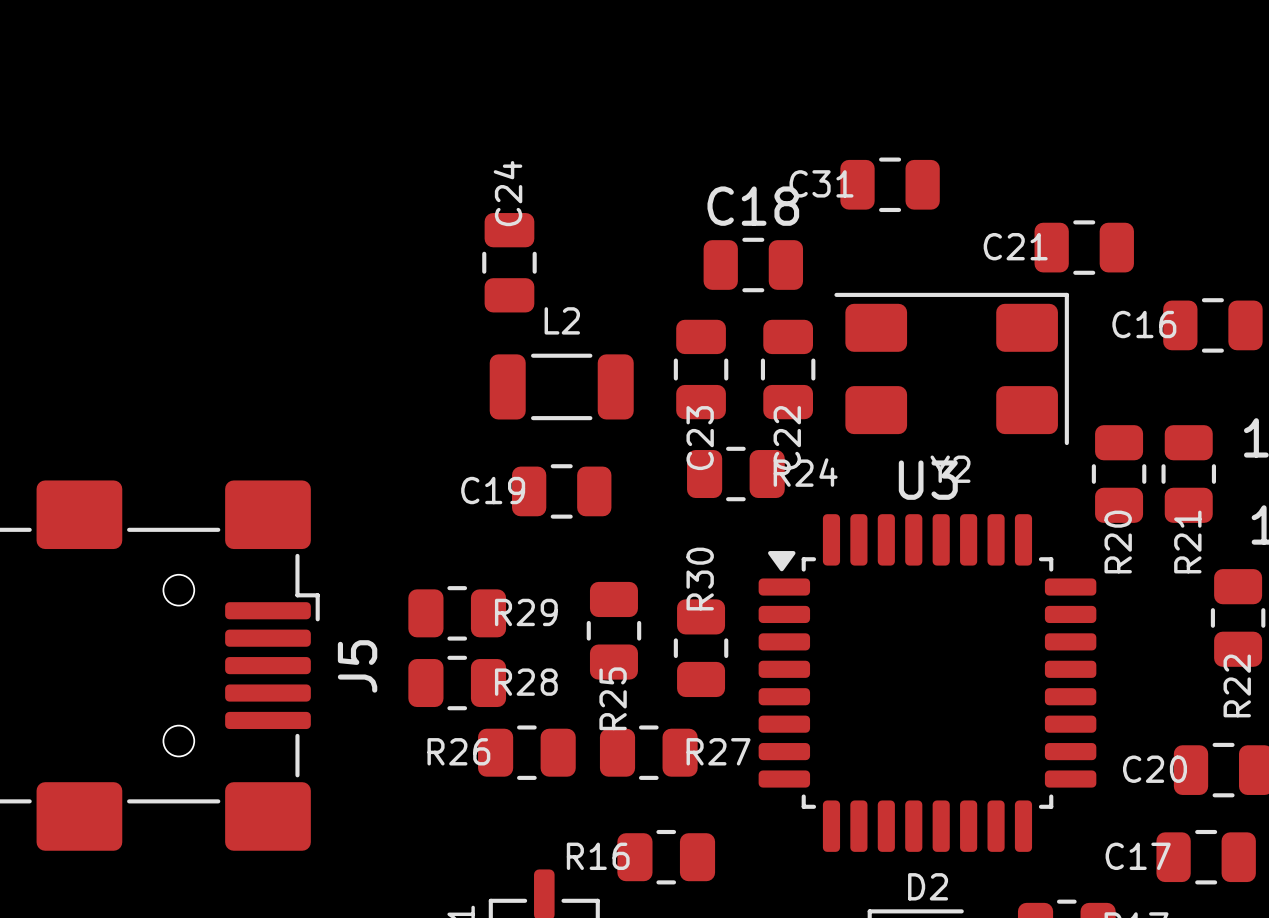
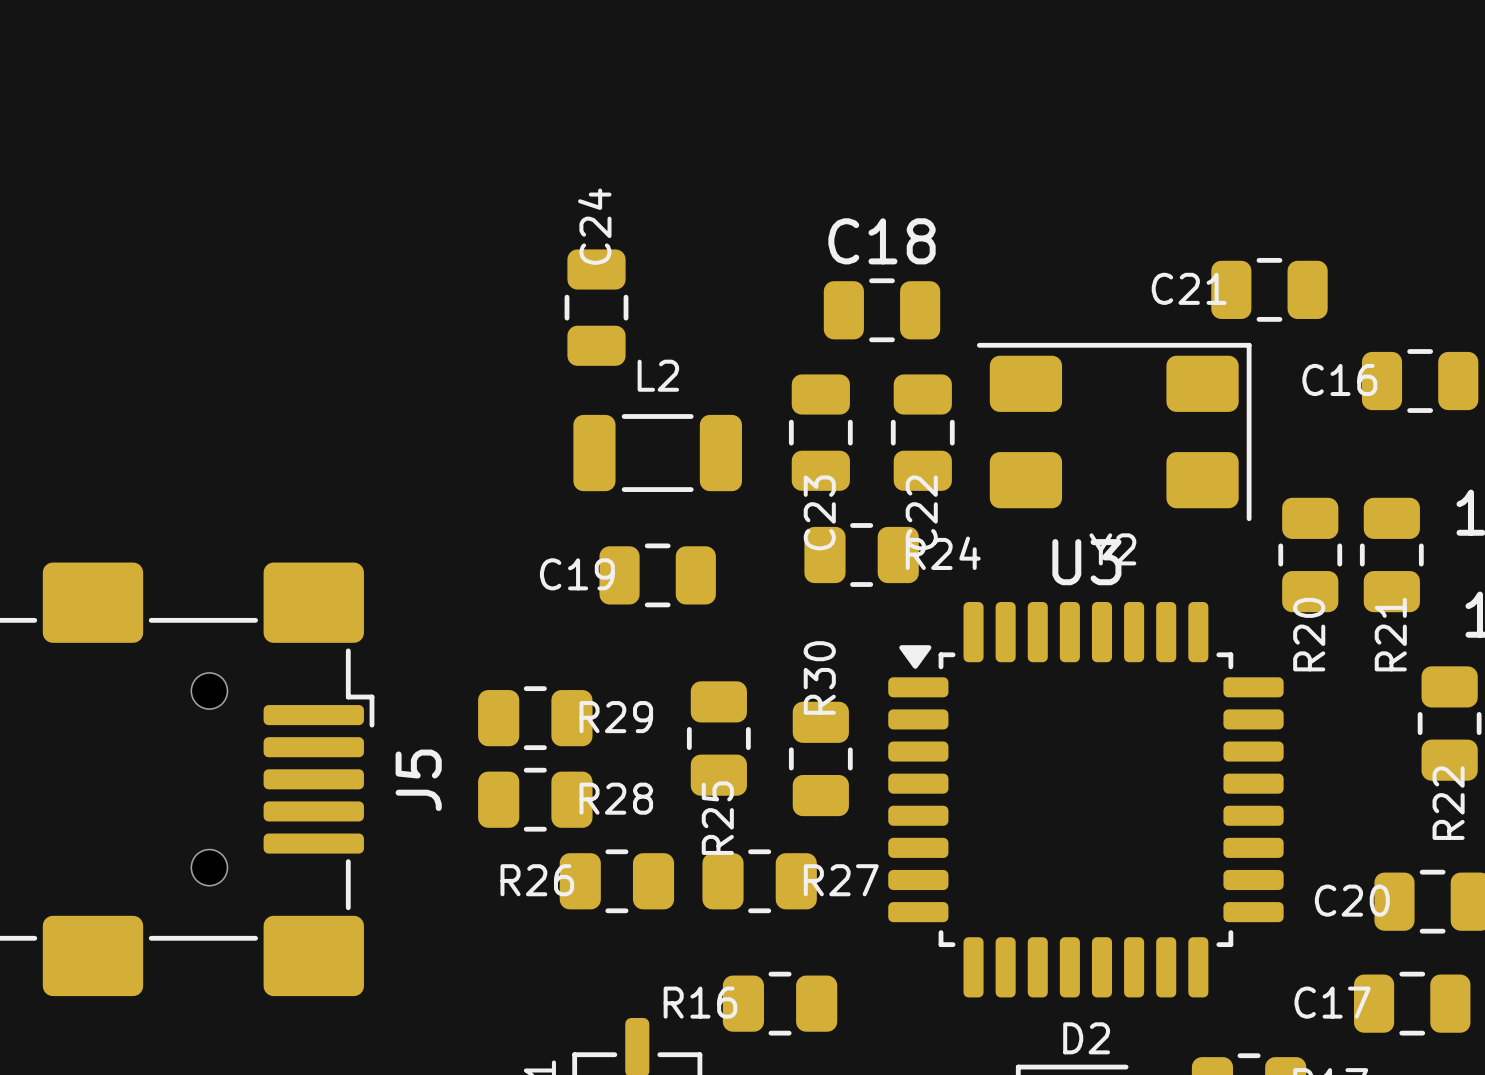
C31: (890, 184) -> none

